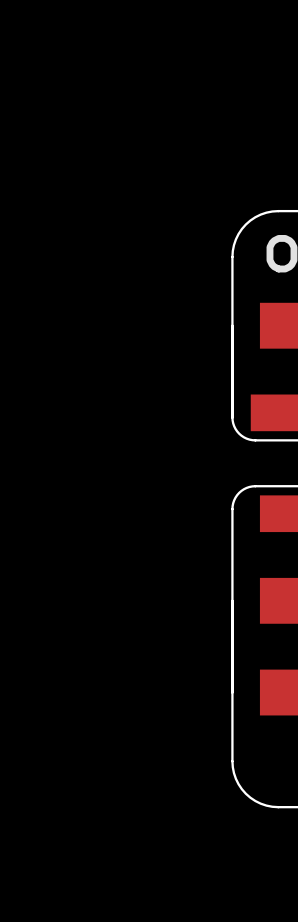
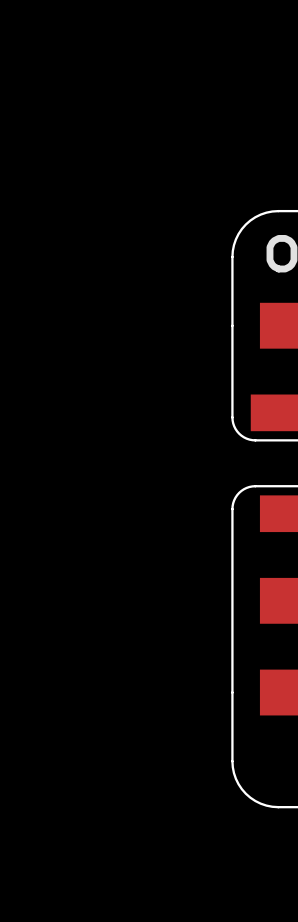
board edge: (232, 325) (232, 417) -> none
board edge: (232, 600) (232, 692) -> none

